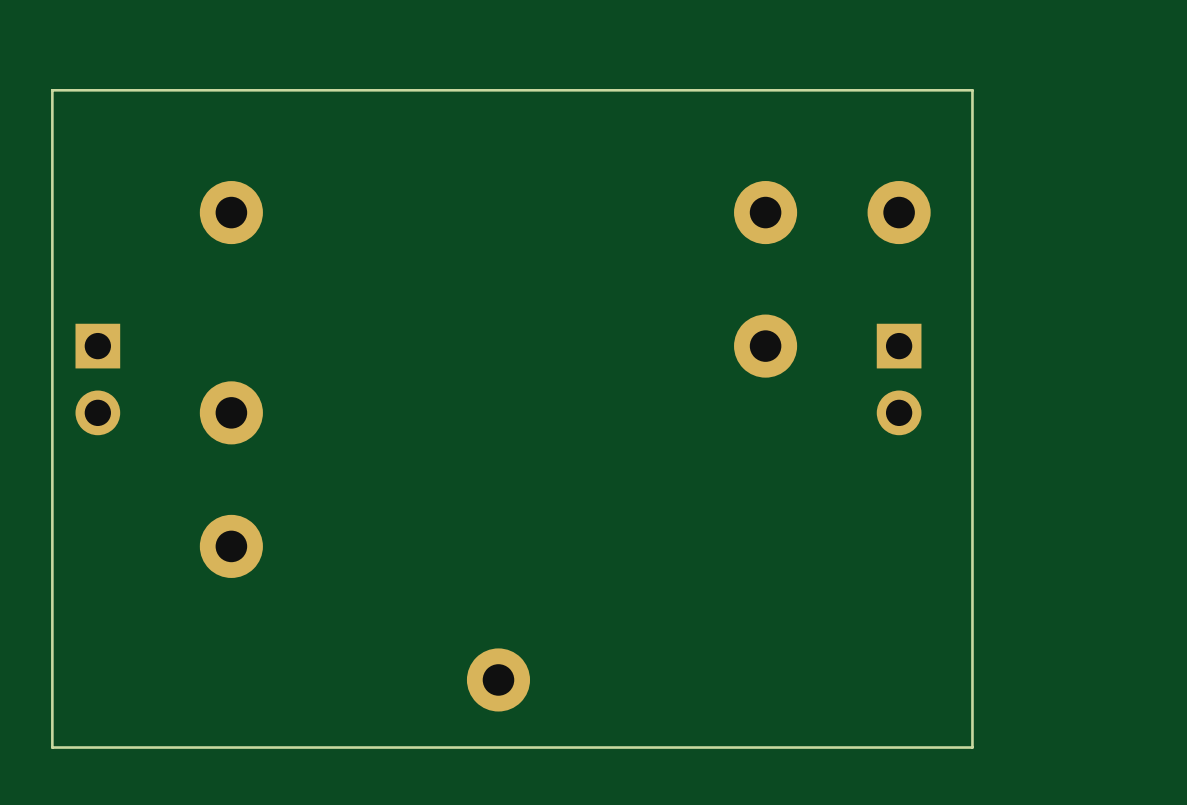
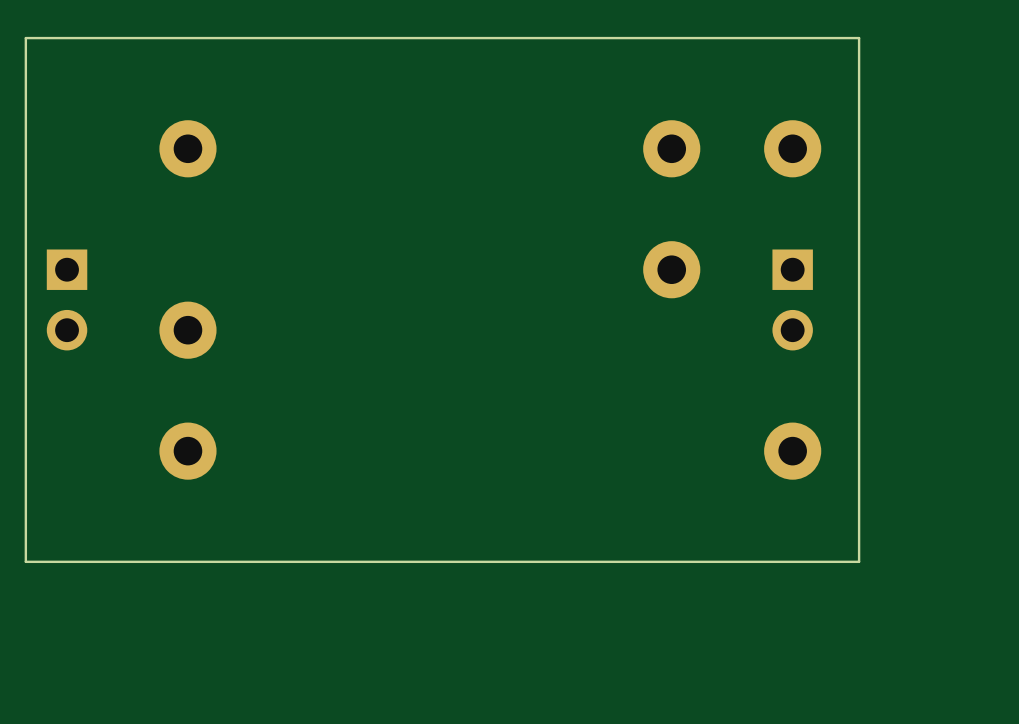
board edge: (972, 668) (972, 747) (52, 747) (52, 668) -> (859, 561) (25, 561)
part position: (498, 679) -> (792, 451)

